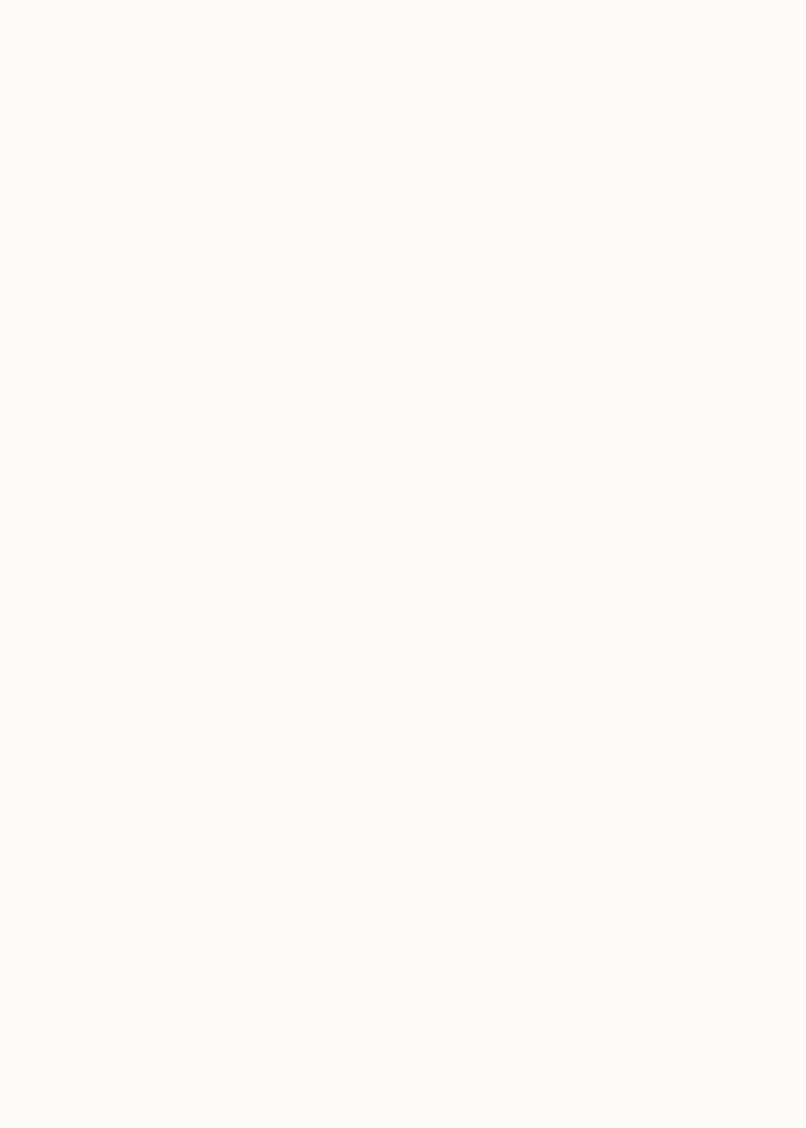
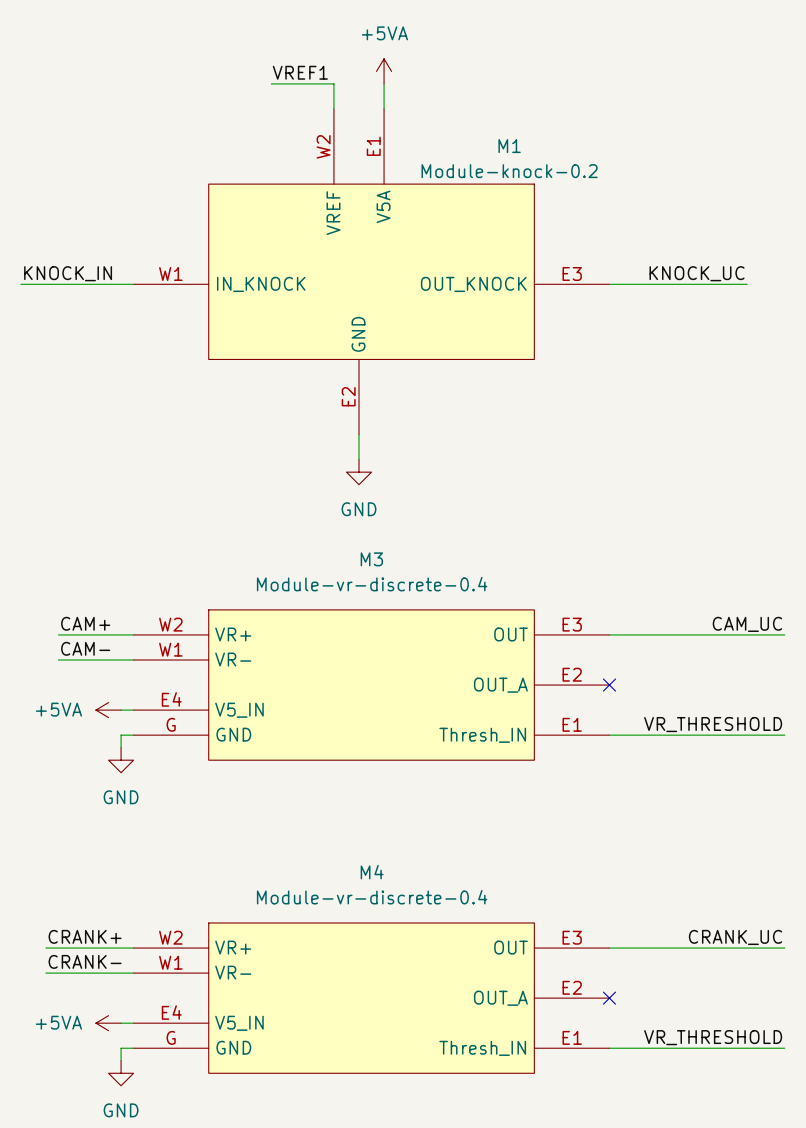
power symbol: none -> +5VA (384, 71)
label: none -> VREF1 (300, 72)
wire: none -> (271, 83) (333, 83) (333, 108)
wire: none -> (384, 83) (384, 108)
M1: none -> Module-knock-0.2 (371, 271)
label: none -> KNOCK_IN (68, 273)
label: none -> KNOCK_UC (697, 273)
wire: none -> (20, 284) (133, 284)
wire: none -> (609, 284) (747, 284)
wire: none -> (359, 434) (359, 459)
power symbol: none -> GND (359, 472)
label: none -> CAM+ (85, 623)
label: none -> CAM_UC (747, 624)
wire: none -> (58, 634) (133, 634)
wire: none -> (609, 634) (784, 634)
label: none -> CAM- (85, 648)
wire: none -> (58, 660) (133, 660)
M3: none -> Module-vr-discrete-0.4 (371, 685)
no-connect mark: none -> (609, 685)
power symbol: none -> +5VA (108, 710)
wire: none -> (121, 710) (133, 710)
label: none -> VR_THRESHOLD (713, 724)
wire: none -> (133, 735) (121, 735) (121, 747)
wire: none -> (609, 735) (784, 735)
power symbol: none -> GND (121, 760)
label: none -> CRANK+ (85, 936)
label: none -> CRANK_UC (735, 937)
wire: none -> (45, 948) (133, 948)
wire: none -> (609, 948) (784, 948)
label: none -> CRANK- (85, 961)
wire: none -> (45, 973) (133, 973)
M4: none -> Module-vr-discrete-0.4 (371, 998)
no-connect mark: none -> (609, 998)
power symbol: none -> +5VA (108, 1023)
wire: none -> (121, 1023) (133, 1023)
label: none -> VR_THRESHOLD (713, 1037)
wire: none -> (133, 1048) (121, 1048) (121, 1060)
wire: none -> (609, 1048) (784, 1048)
power symbol: none -> GND (121, 1073)

